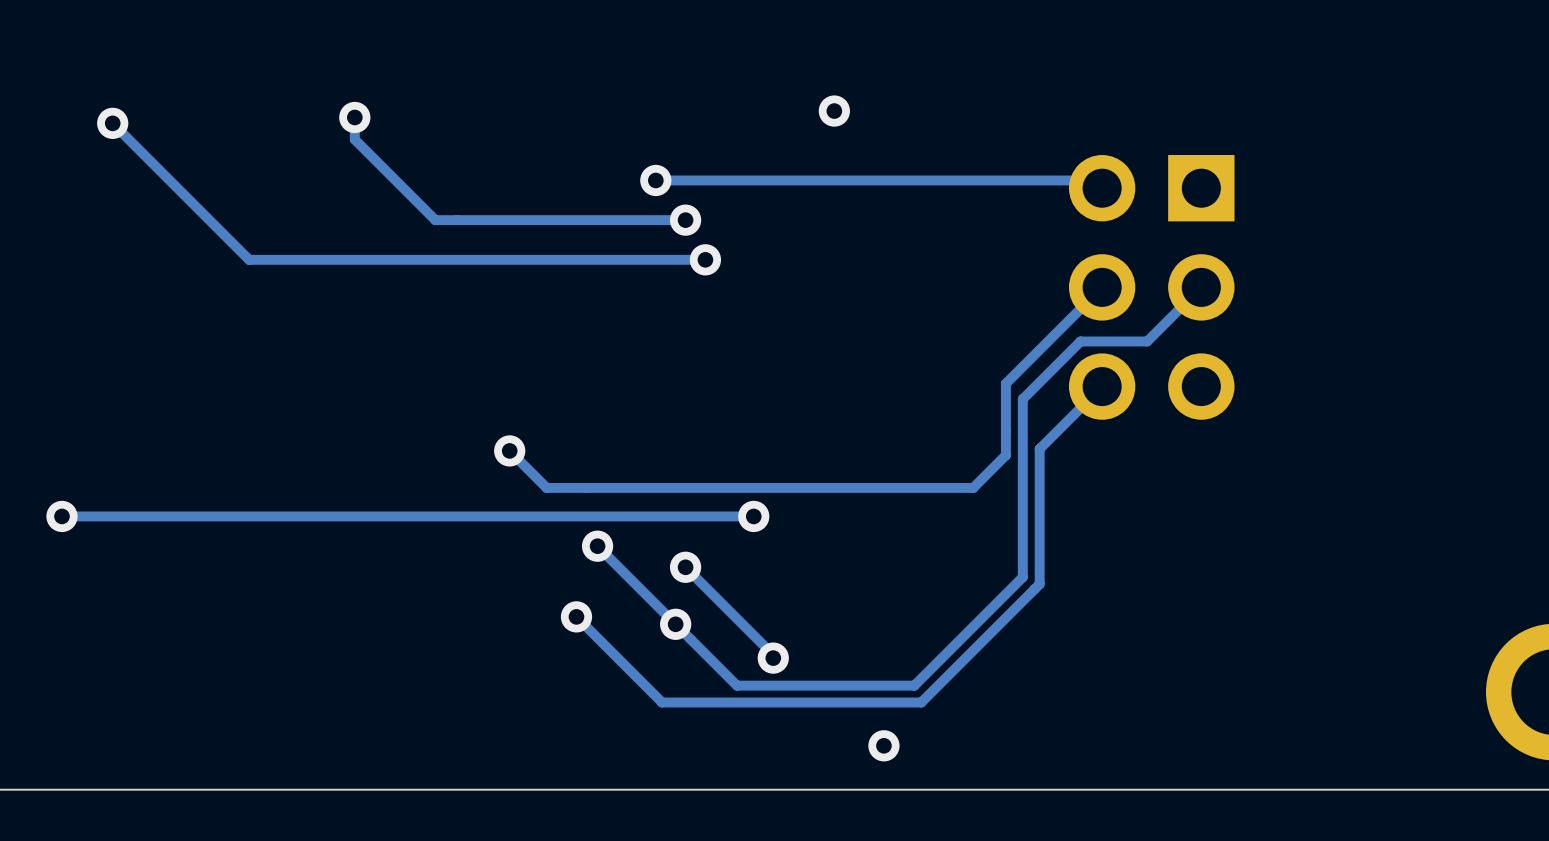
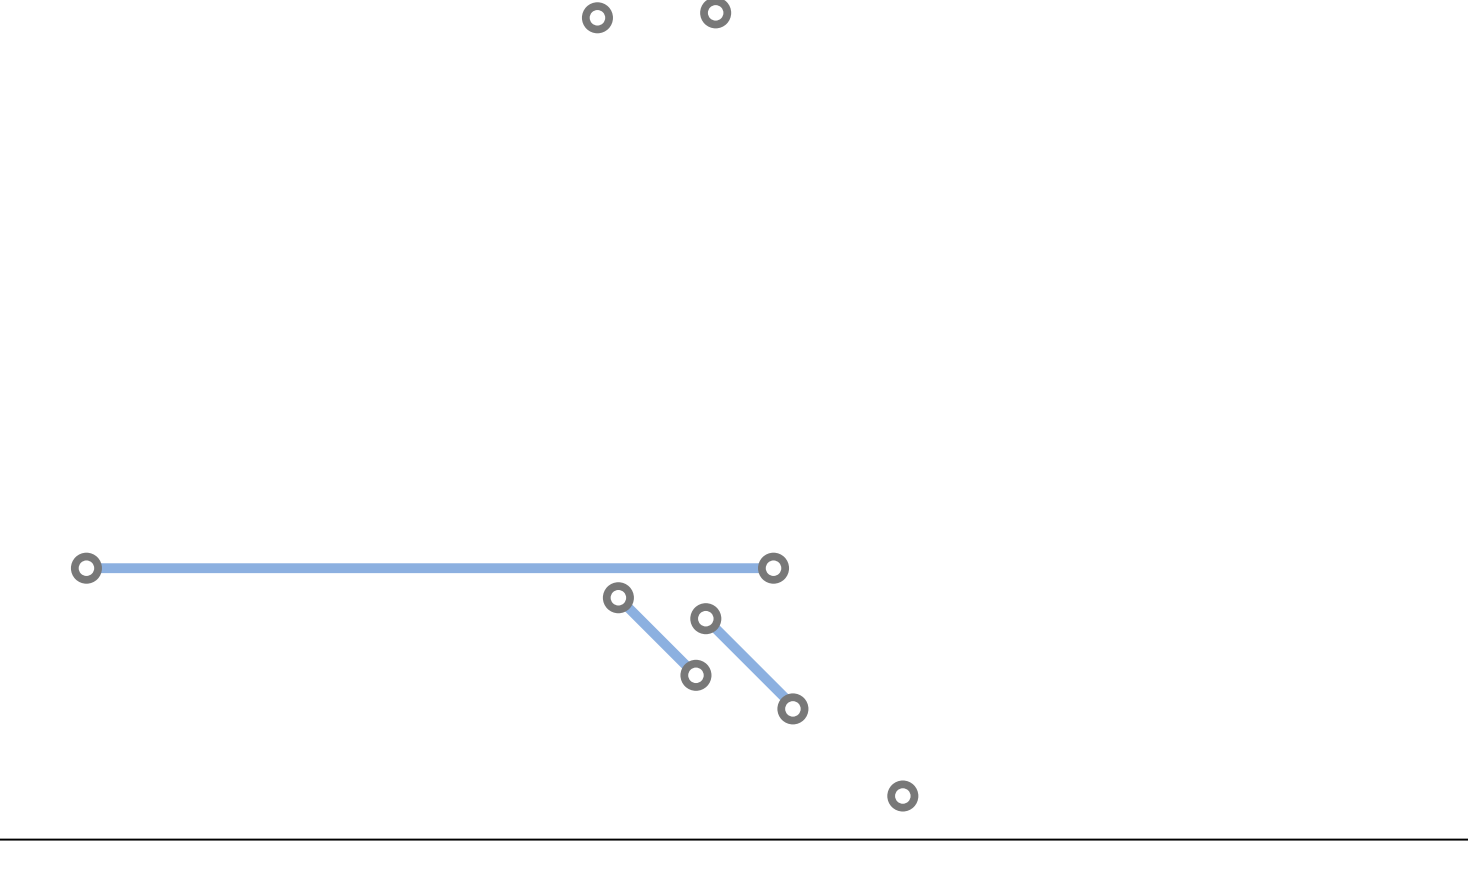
via: (834, 111) -> none
track: (354, 117) (354, 139) (435, 220) (685, 220) -> none
via: (354, 117) -> none
track: (112, 123) (249, 259) (705, 259) -> none
via: (112, 123) -> none
track: (655, 180) (1094, 180) (1102, 188) -> none
via: (655, 180) -> none
via: (685, 220) -> none
via: (705, 259) -> none
track: (1102, 287) (1005, 383) (1005, 455) (973, 487) (546, 487) (509, 450) -> none
part: (1151, 287) -> none
track: (1201, 287) (1147, 341) (1080, 341) (1022, 399) (1022, 577) (914, 685) (737, 685) (675, 624) -> none
track: (1102, 386) (1039, 449) (1039, 584) (921, 702) (662, 702) (576, 616) -> none
via: (509, 450) -> none
via: (576, 616) -> none

